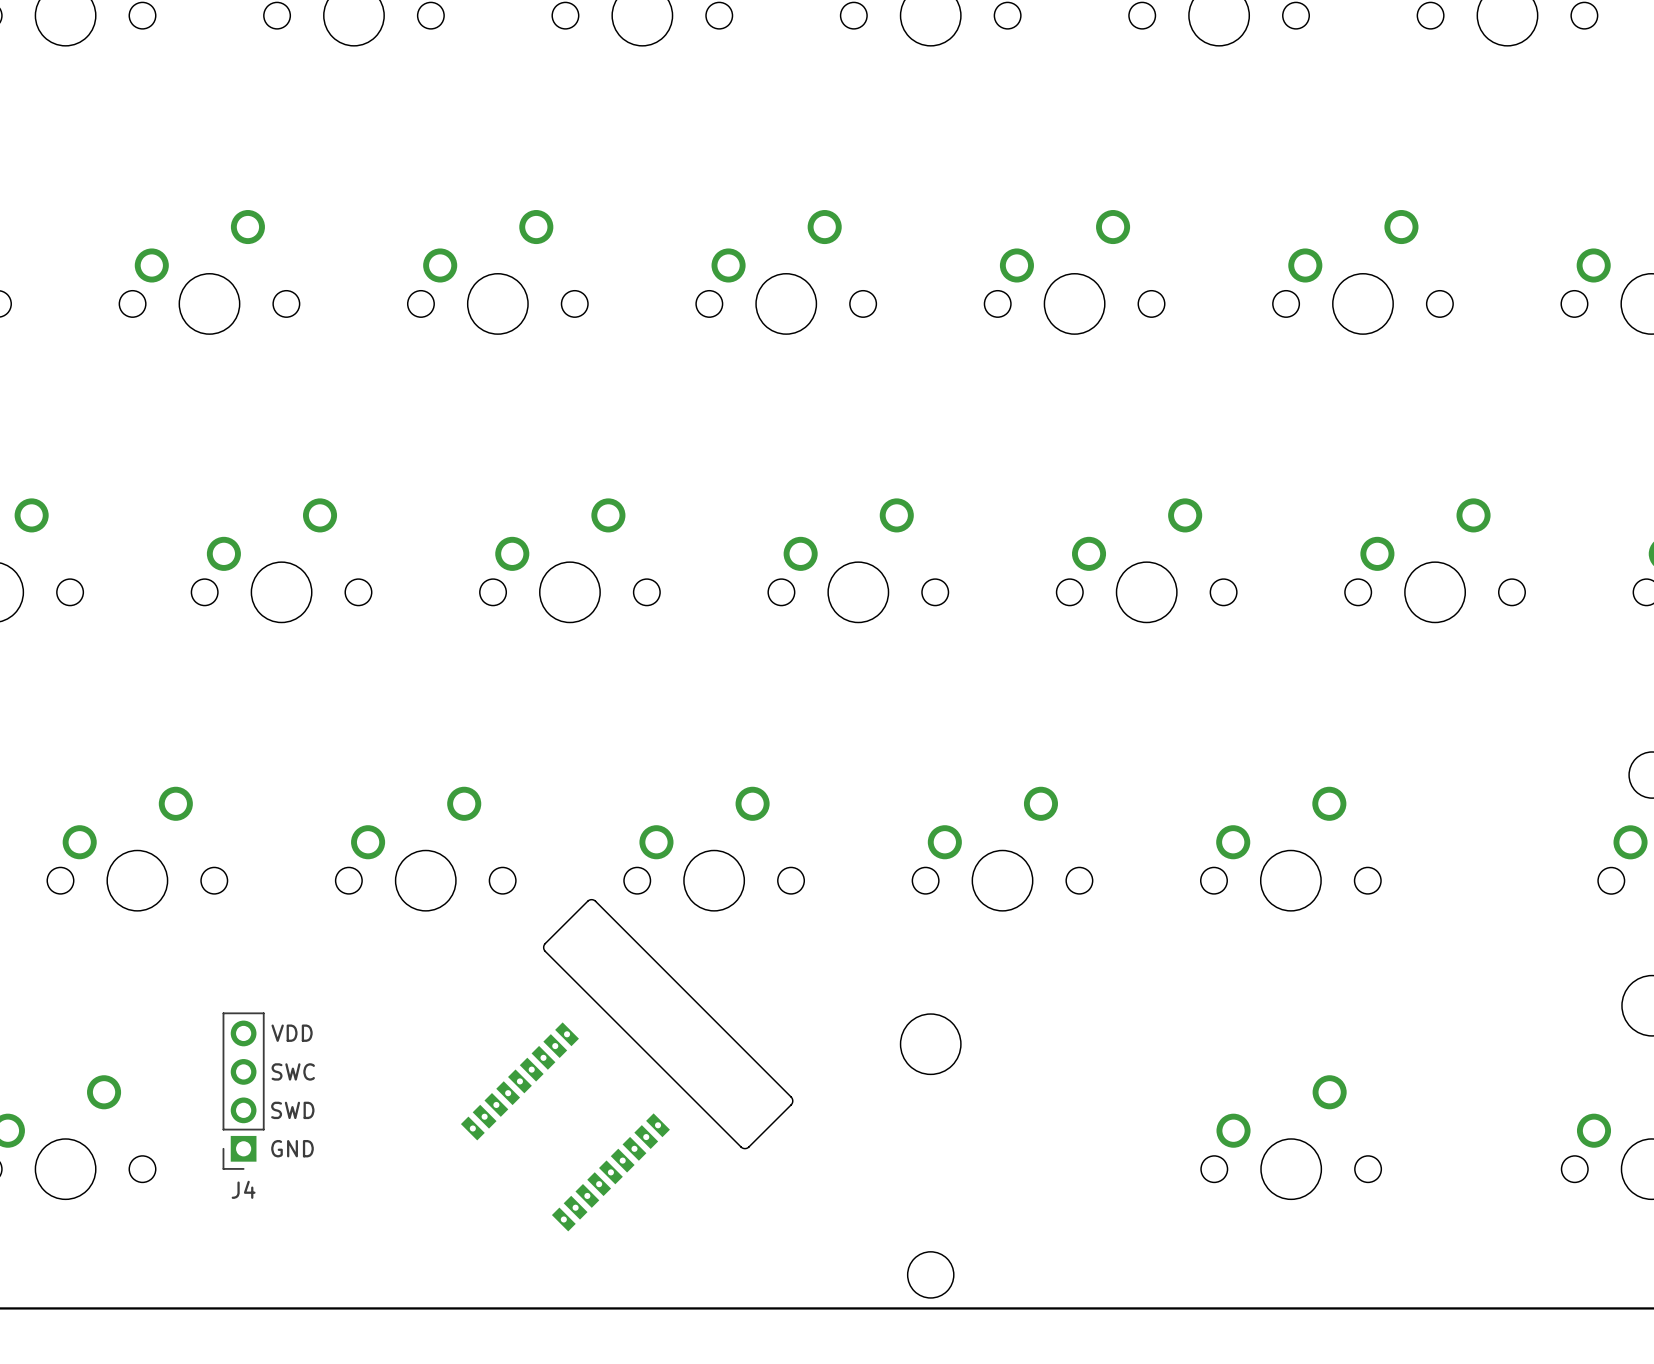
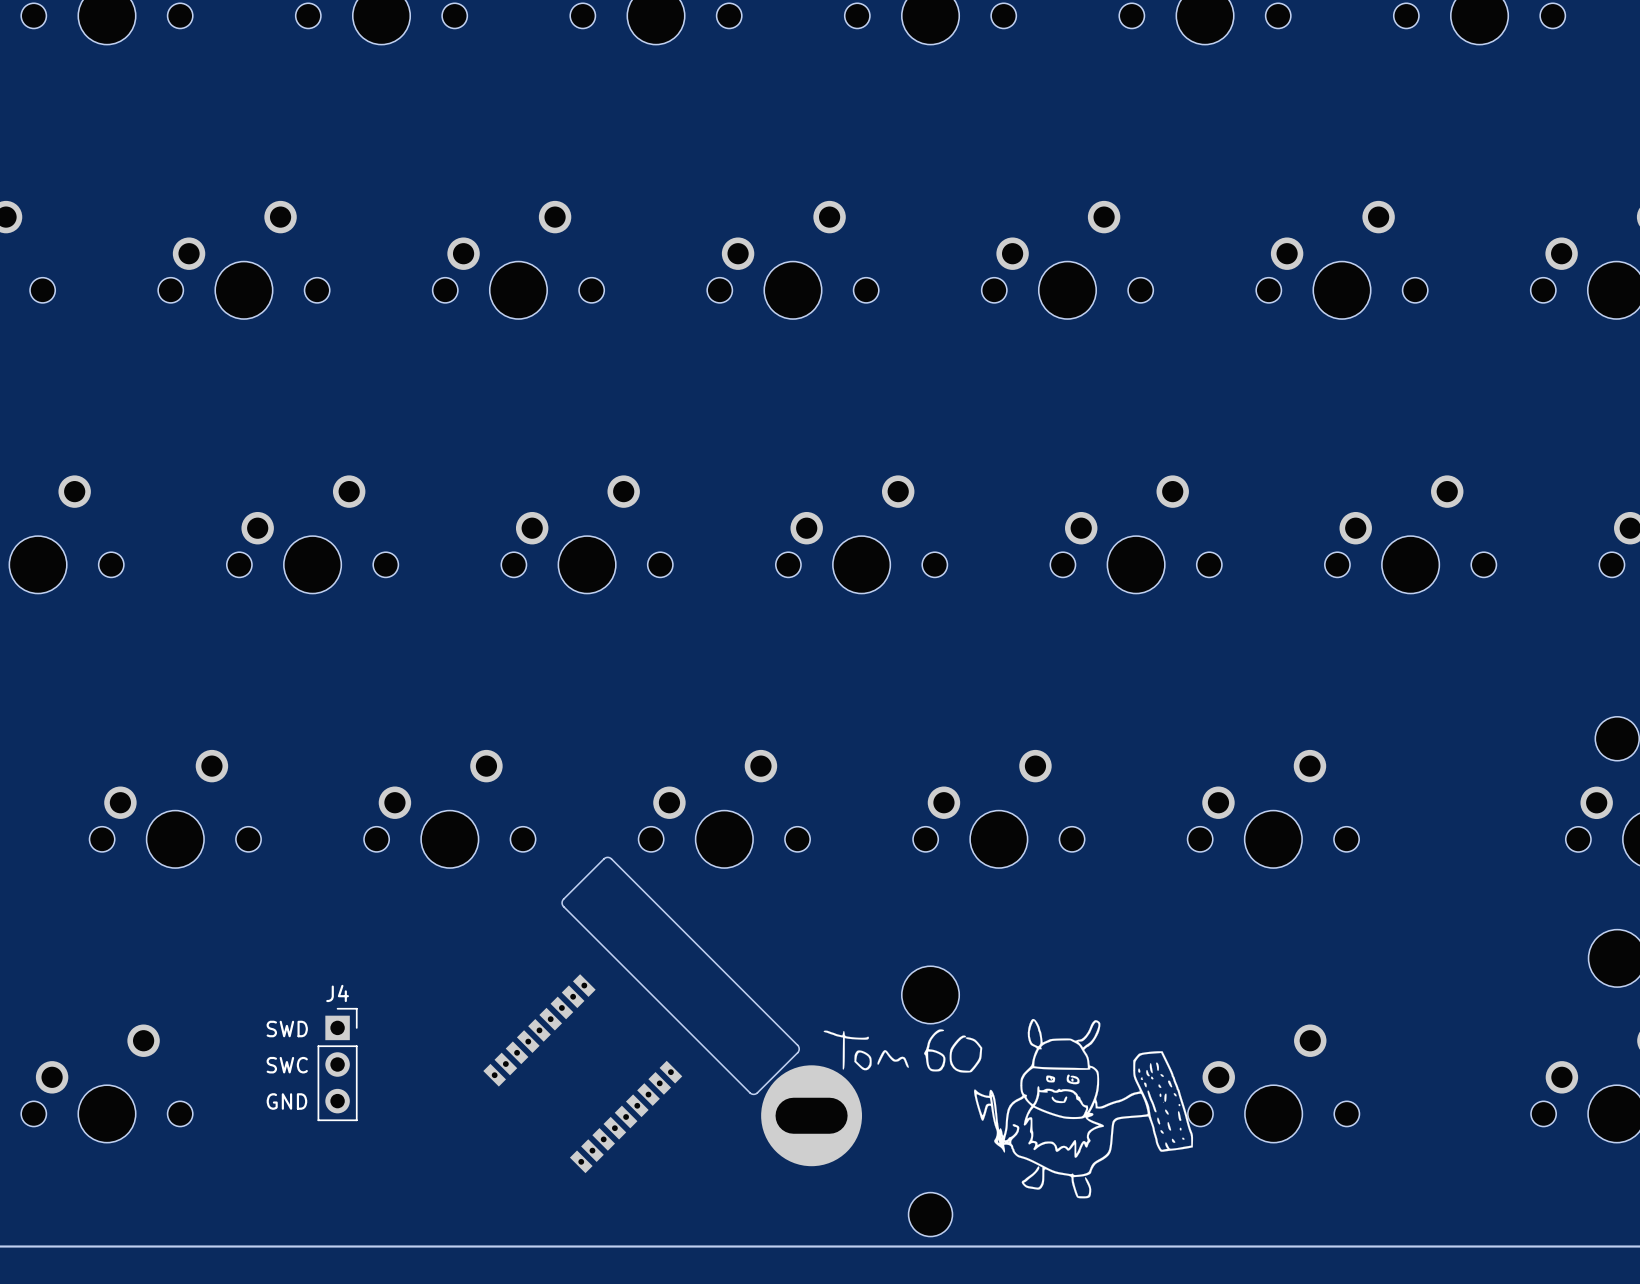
J4 footprint: [222, 1012, 265, 1170] -> [317, 1007, 358, 1122]
text: VDD (292, 1033) -> none
drawing: none -> [823, 1018, 1194, 1199]
text position: SWC (293, 1071) -> SWC (287, 1065)
text position: SWD (292, 1110) -> SWD (287, 1029)
text position: GND (292, 1148) -> GND (286, 1101)
part: none -> (811, 1115)
J4 name position: J4 (243, 1189) -> J4 (337, 993)

